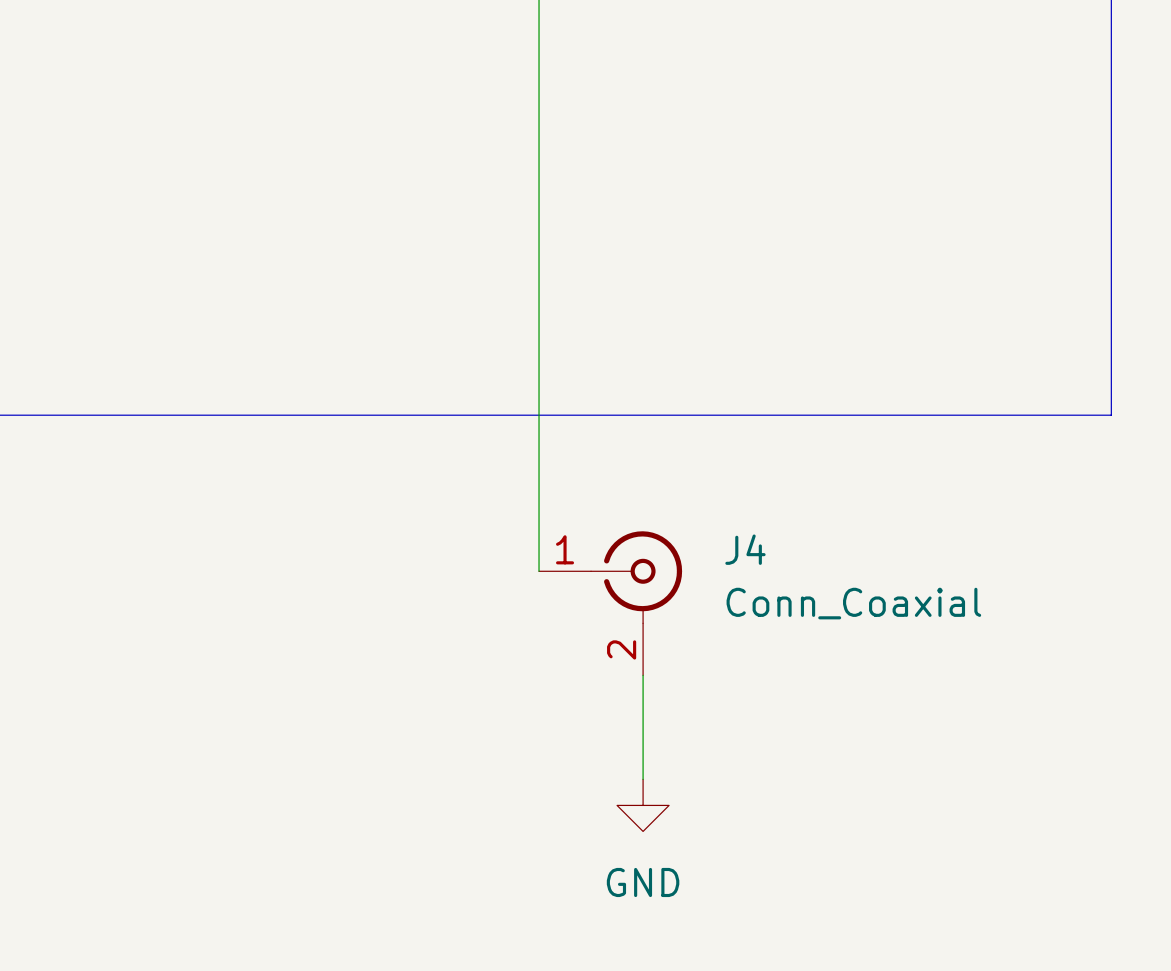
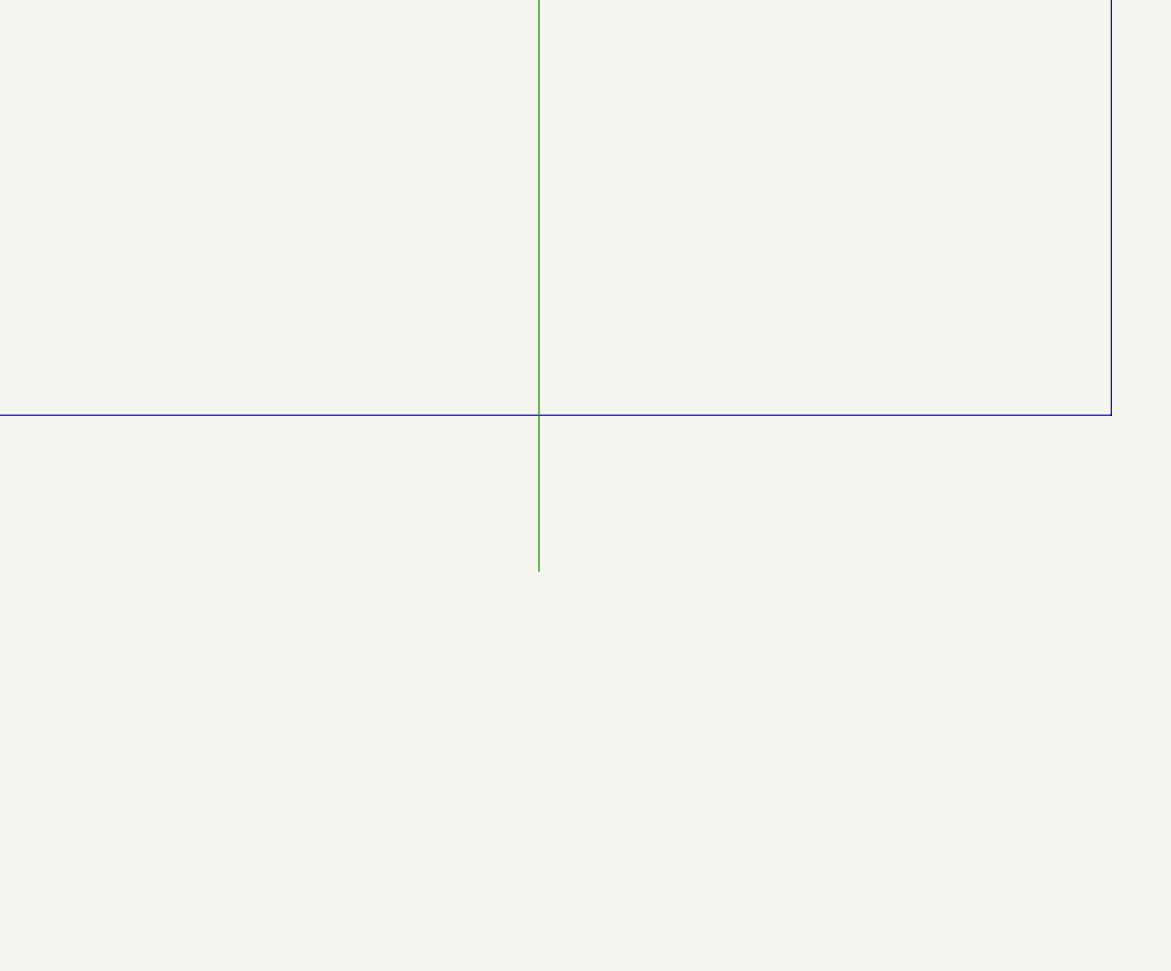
J4: Conn_Coaxial (610, 603) -> none
wire: (643, 675) (643, 779) -> none
power symbol: GND (643, 805) -> none

